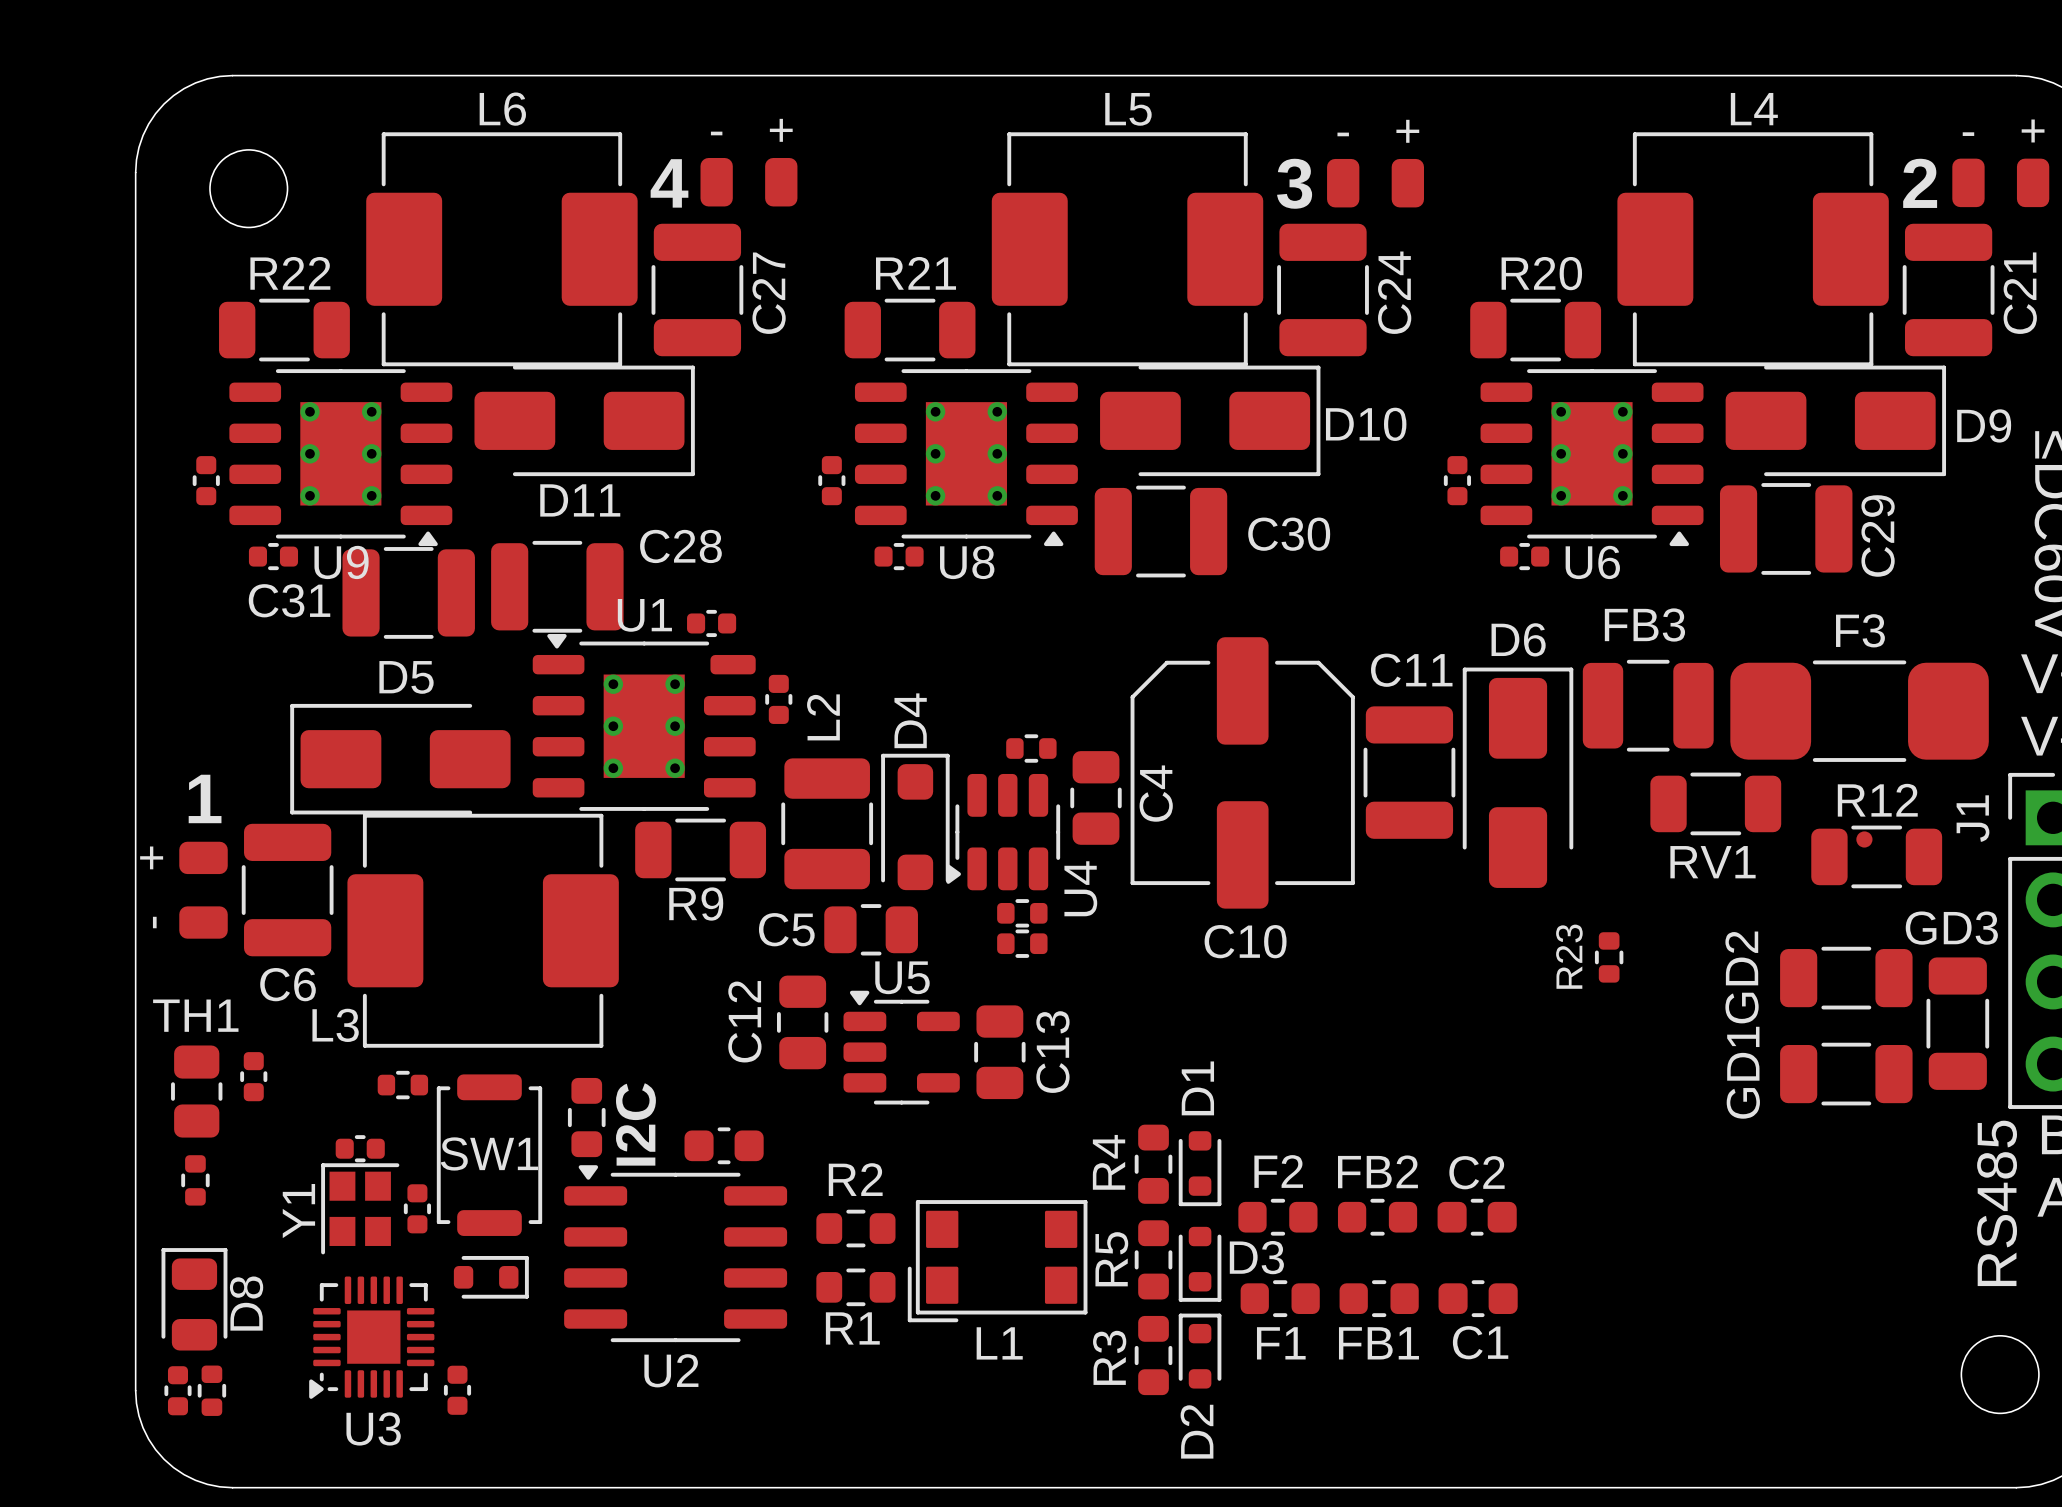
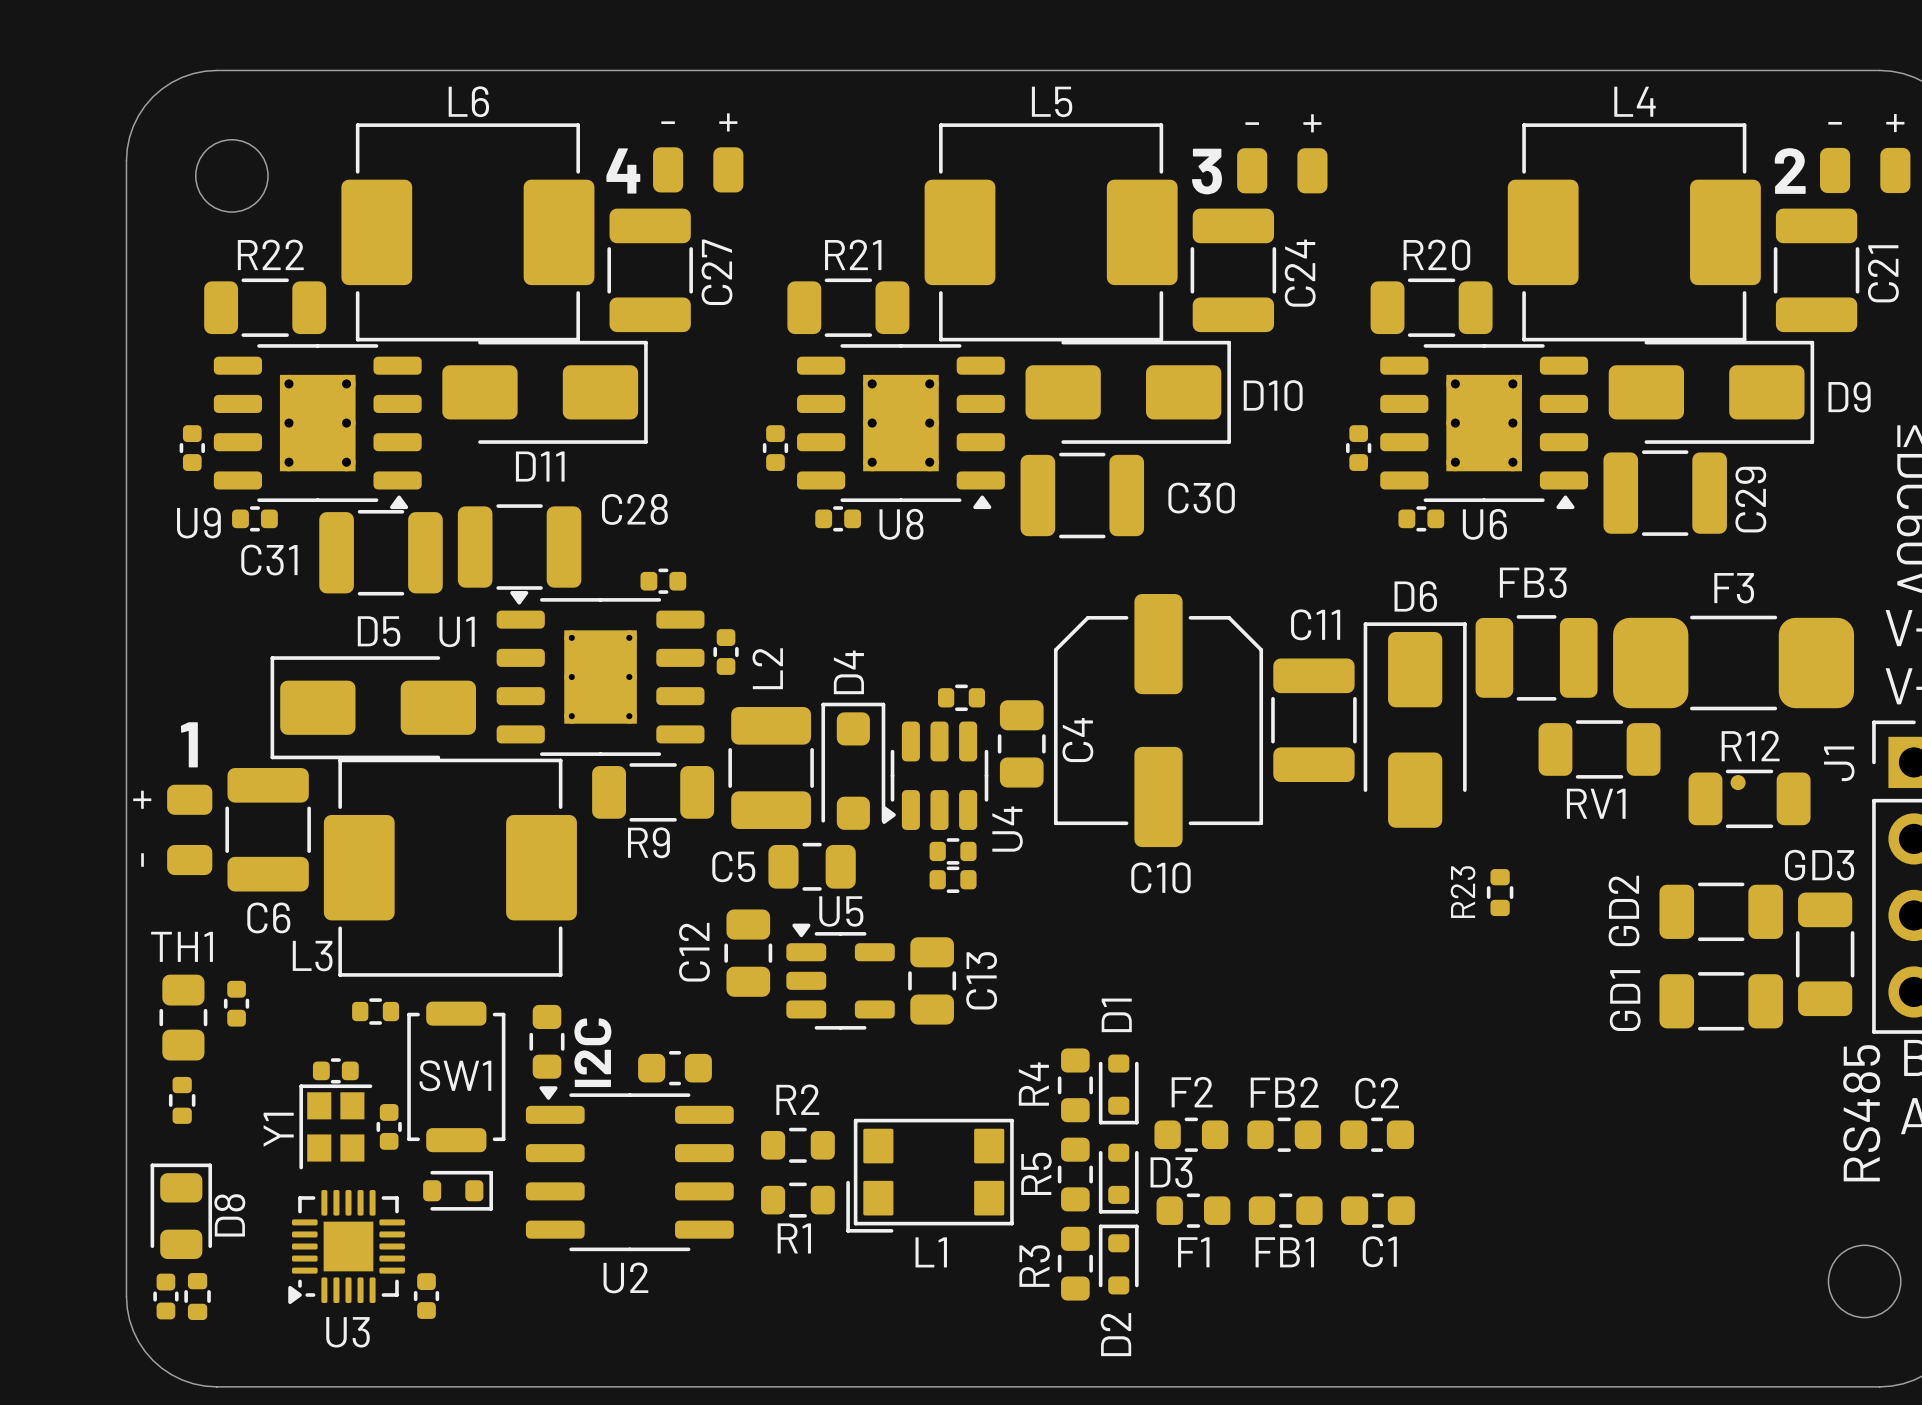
U9 name position: U9 (341, 562) -> U9 (198, 523)
U1 name position: U1 (644, 615) -> U1 (457, 631)
U1 footprint: [532, 633, 756, 811] -> [496, 591, 705, 756]

